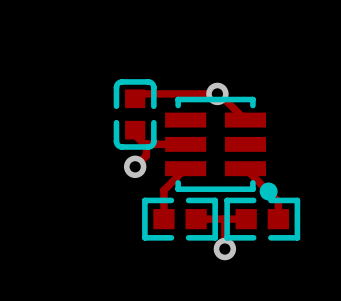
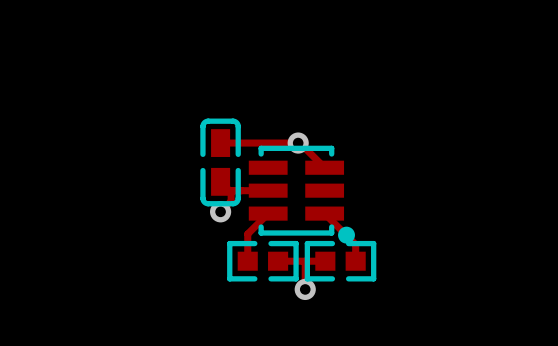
part footprint: [113, 79, 157, 150] -> [200, 118, 241, 207]

